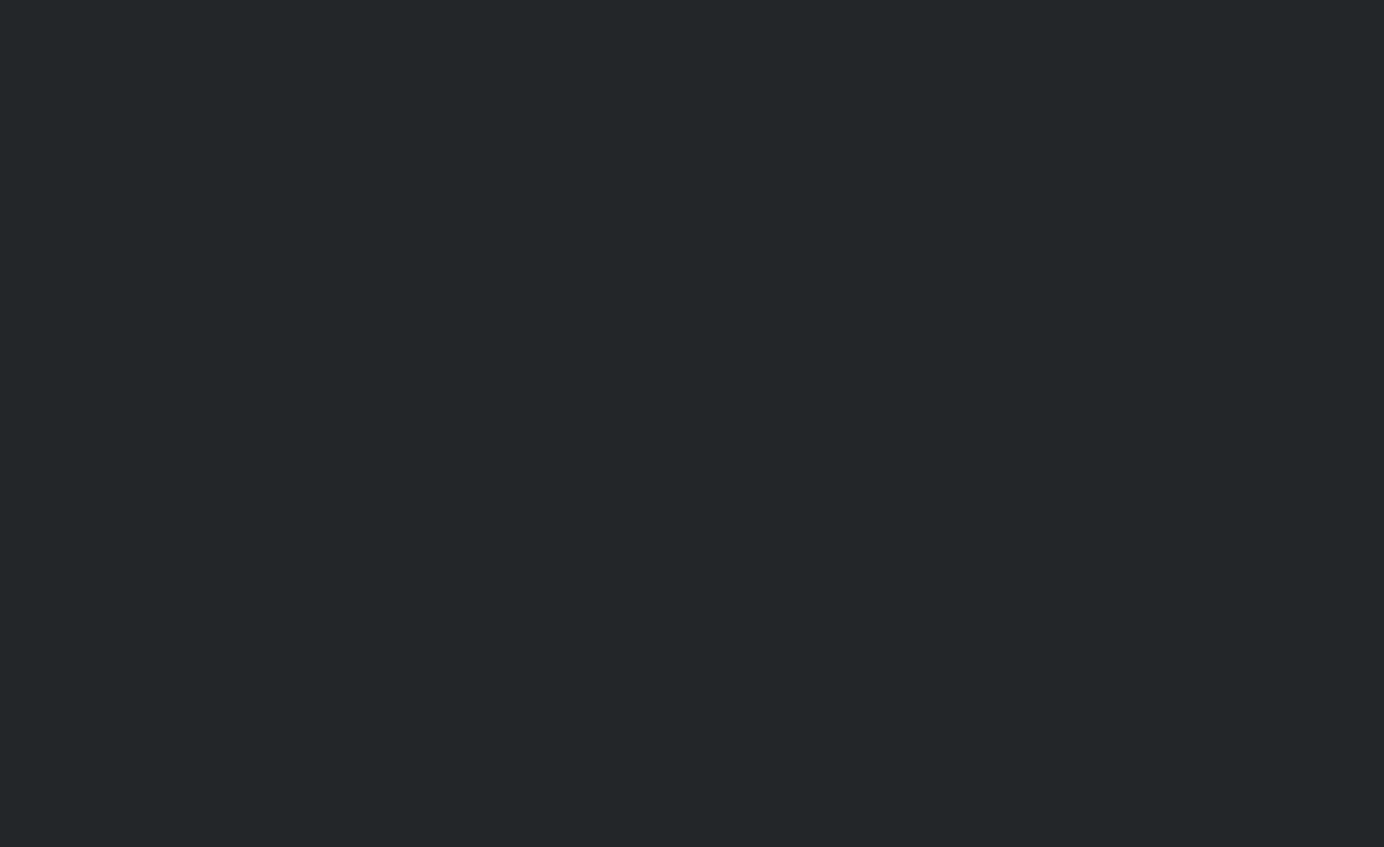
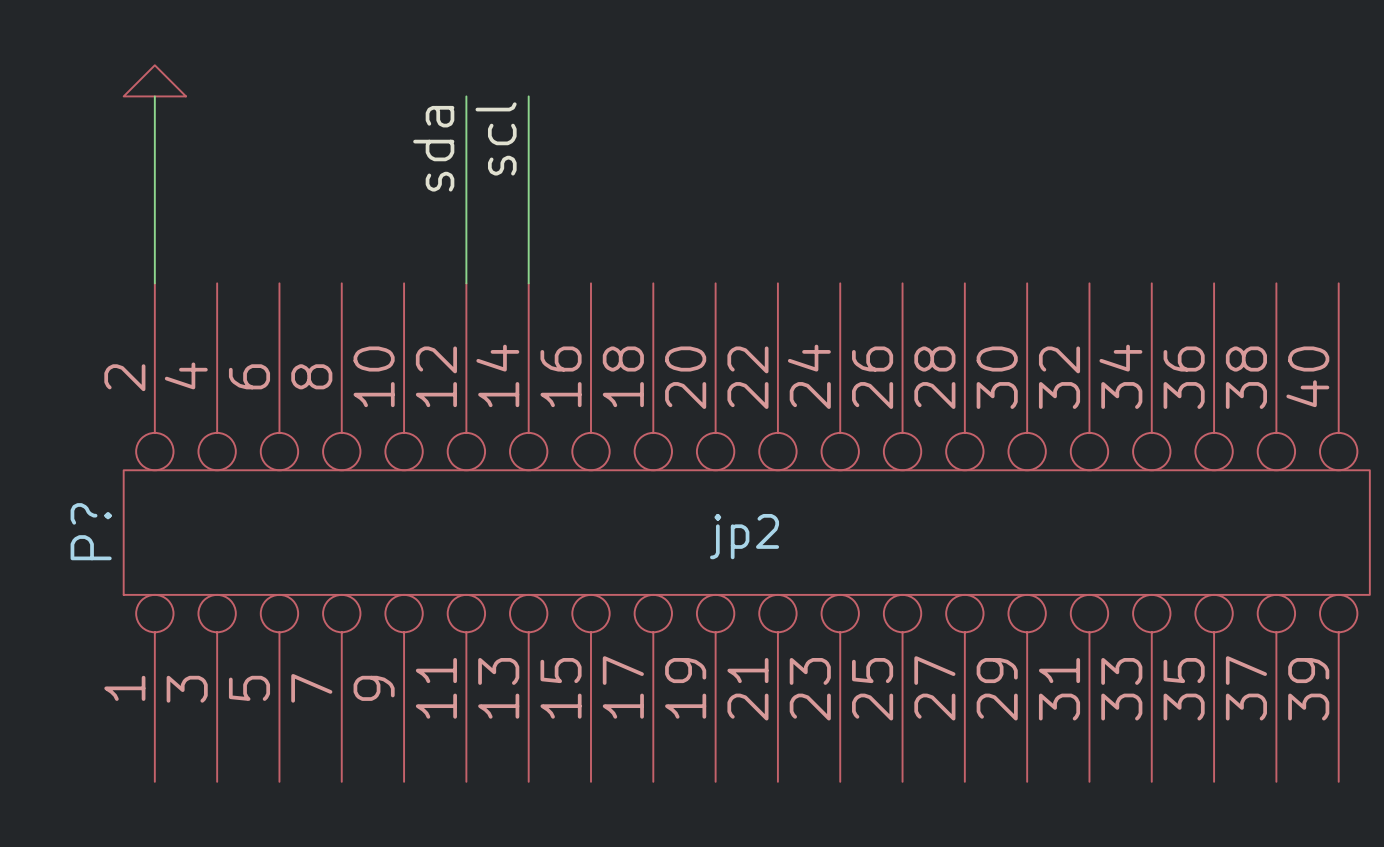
power symbol: none -> (154, 80)
wire: none -> (154, 96) (154, 283)
wire: none -> (466, 96) (466, 283)
wire: none -> (528, 96) (528, 283)
label: none -> scl (496, 138)
label: none -> sda (433, 148)
P?: none -> jp2 (746, 532)

